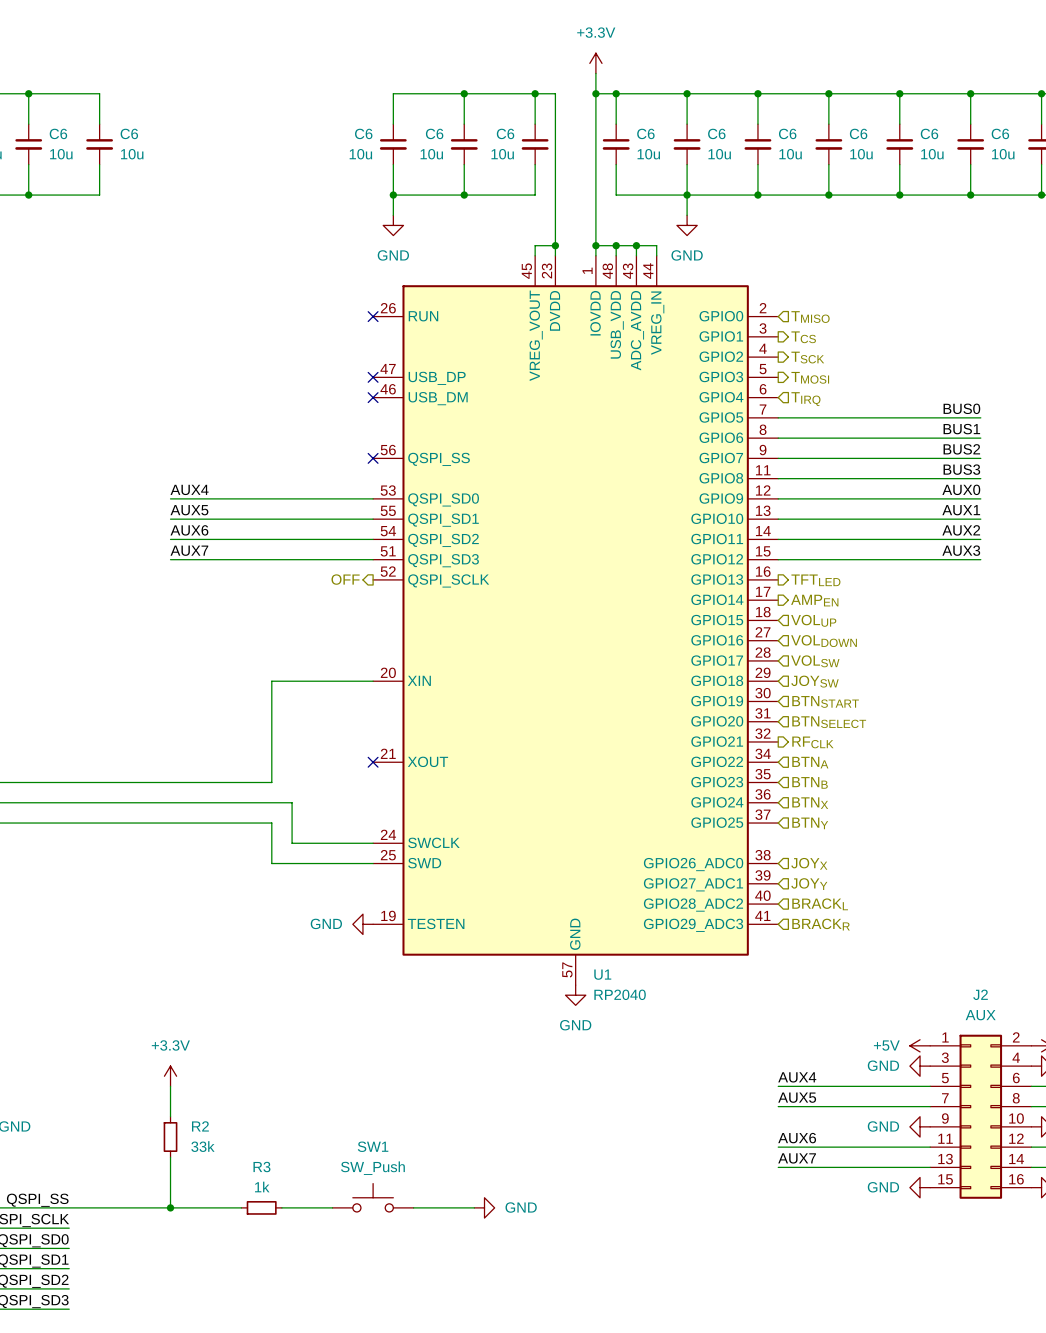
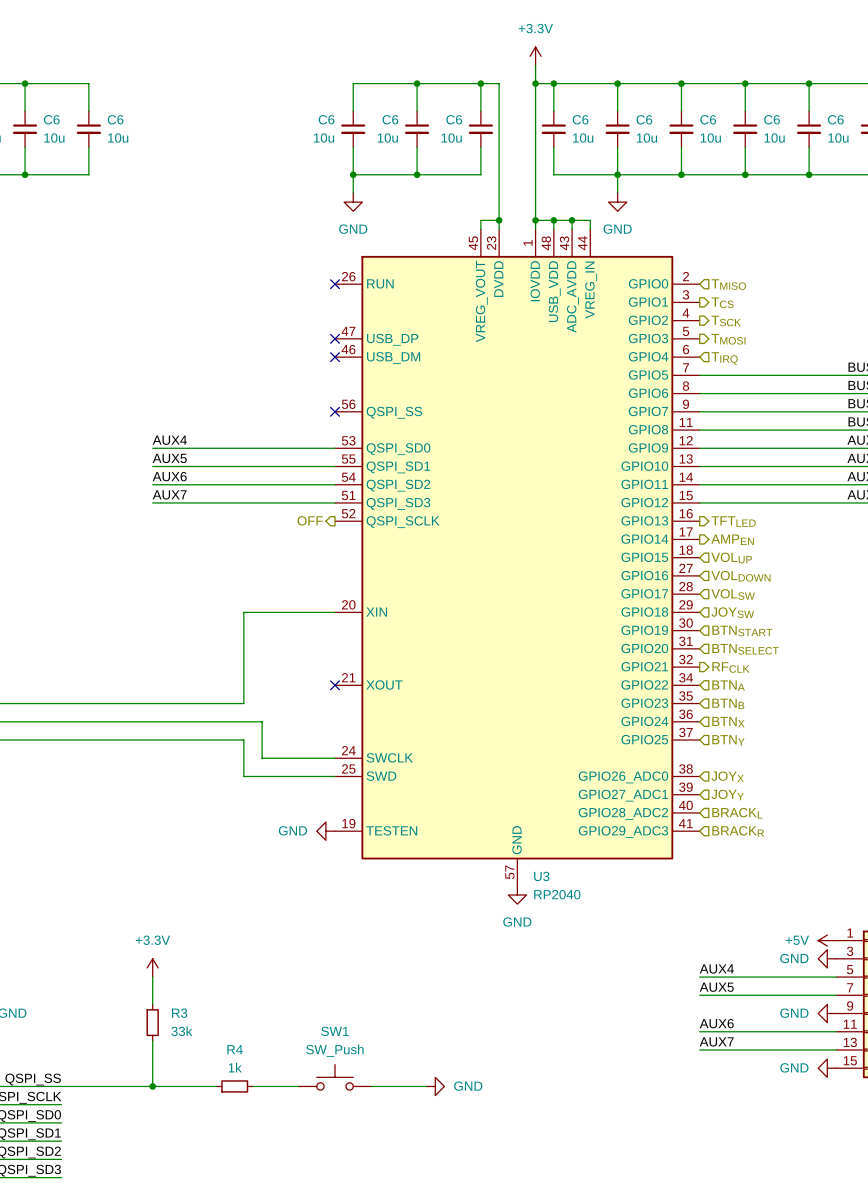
U1 name: U1 (602, 974) -> U3 (541, 876)
R2 name: R2 (200, 1126) -> R3 (179, 1013)
R3 name: R3 (261, 1167) -> R4 (235, 1049)

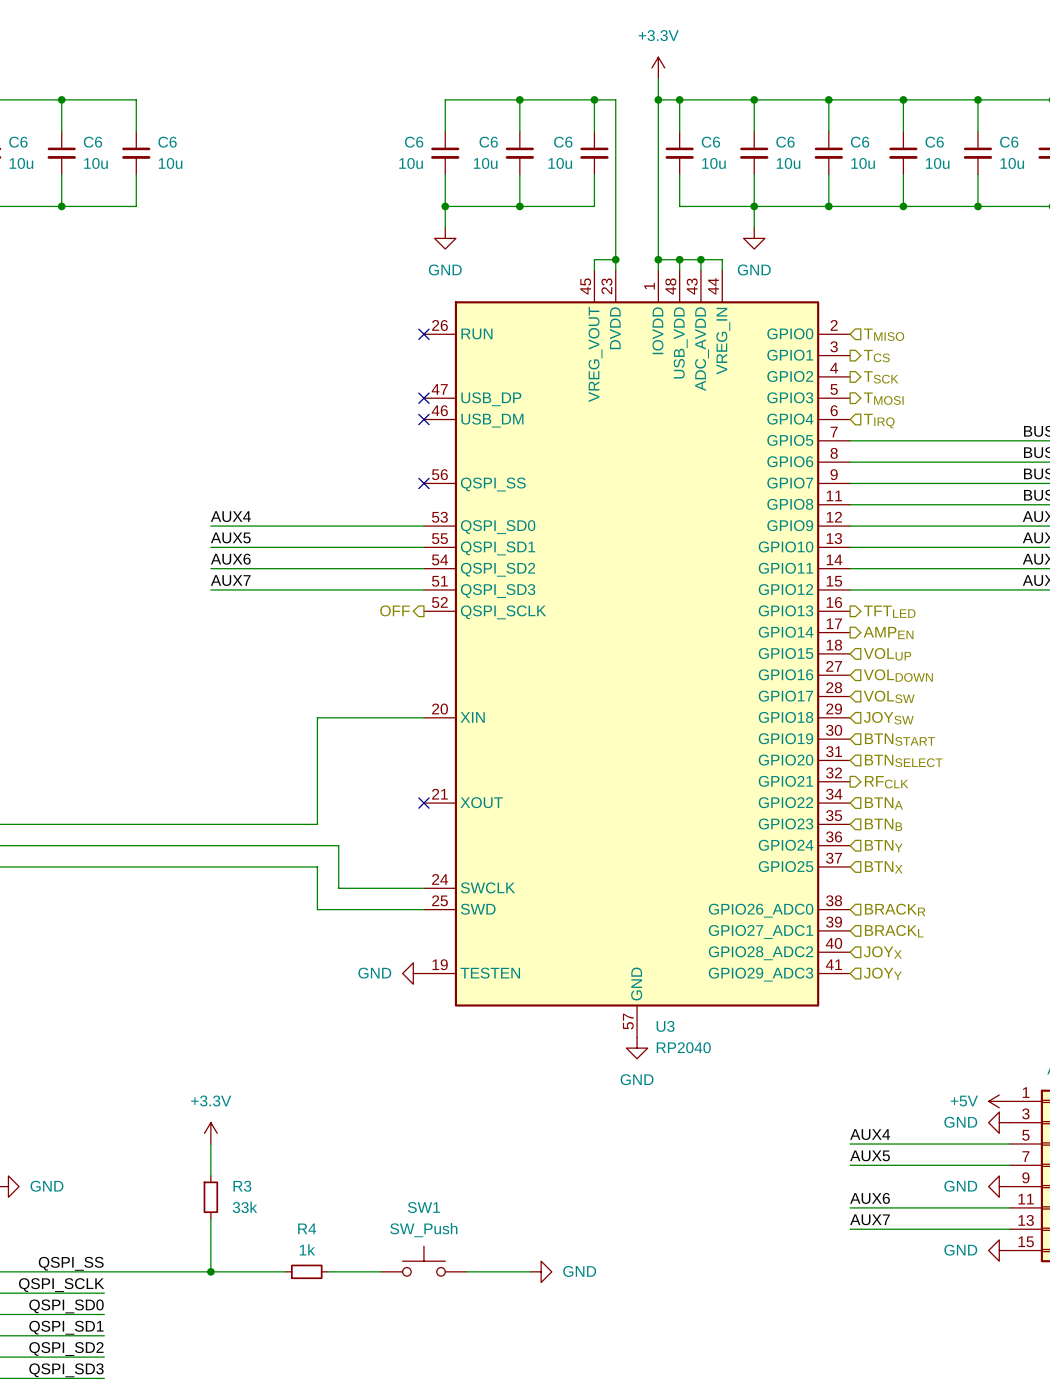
hierarchical label: BTNX (728, 722) -> BTNY (883, 846)
hierarchical label: BTNY (728, 740) -> BTNX (883, 867)
hierarchical label: JOYX (727, 776) -> BRACKR (895, 909)
hierarchical label: JOYY (727, 794) -> BRACKL (894, 931)
hierarchical label: BRACKL (737, 813) -> JOYX (882, 952)
hierarchical label: BRACKR (738, 831) -> JOYY (882, 973)

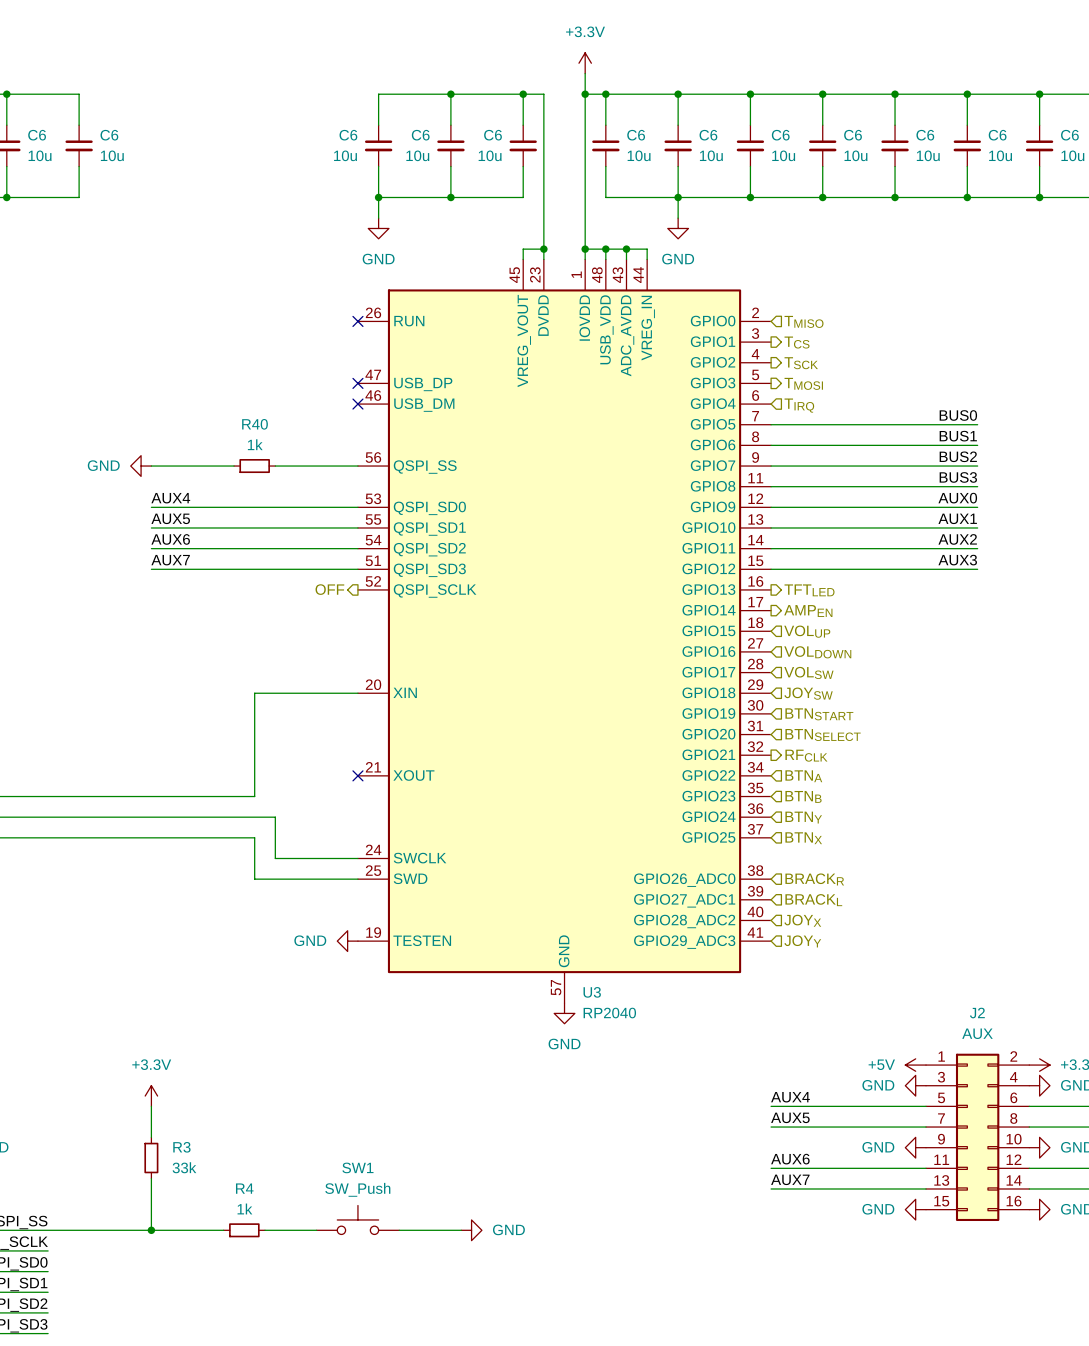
power symbol: none -> GND (141, 466)
wire: none -> (151, 466) (234, 466)
R40: none -> 1k (254, 466)
wire: none -> (275, 466) (357, 466)
no-connect mark: (423, 483) -> none

